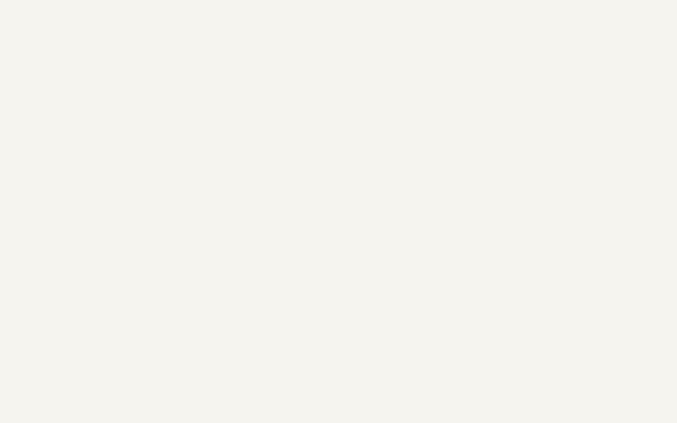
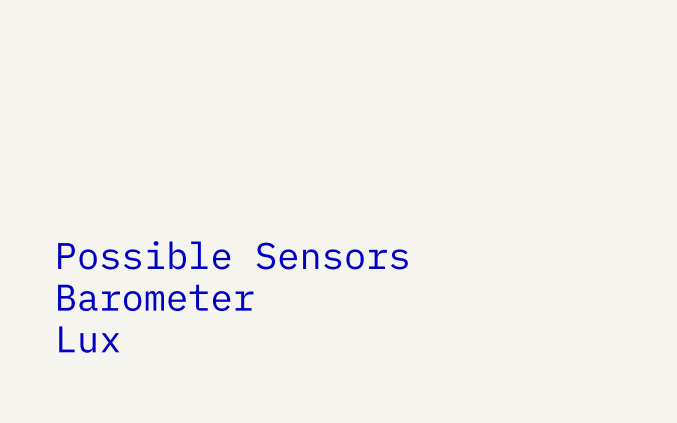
text: none -> Possible Sensors (232, 255)
text: none -> Barometer (155, 297)
text: none -> Lux (89, 339)

